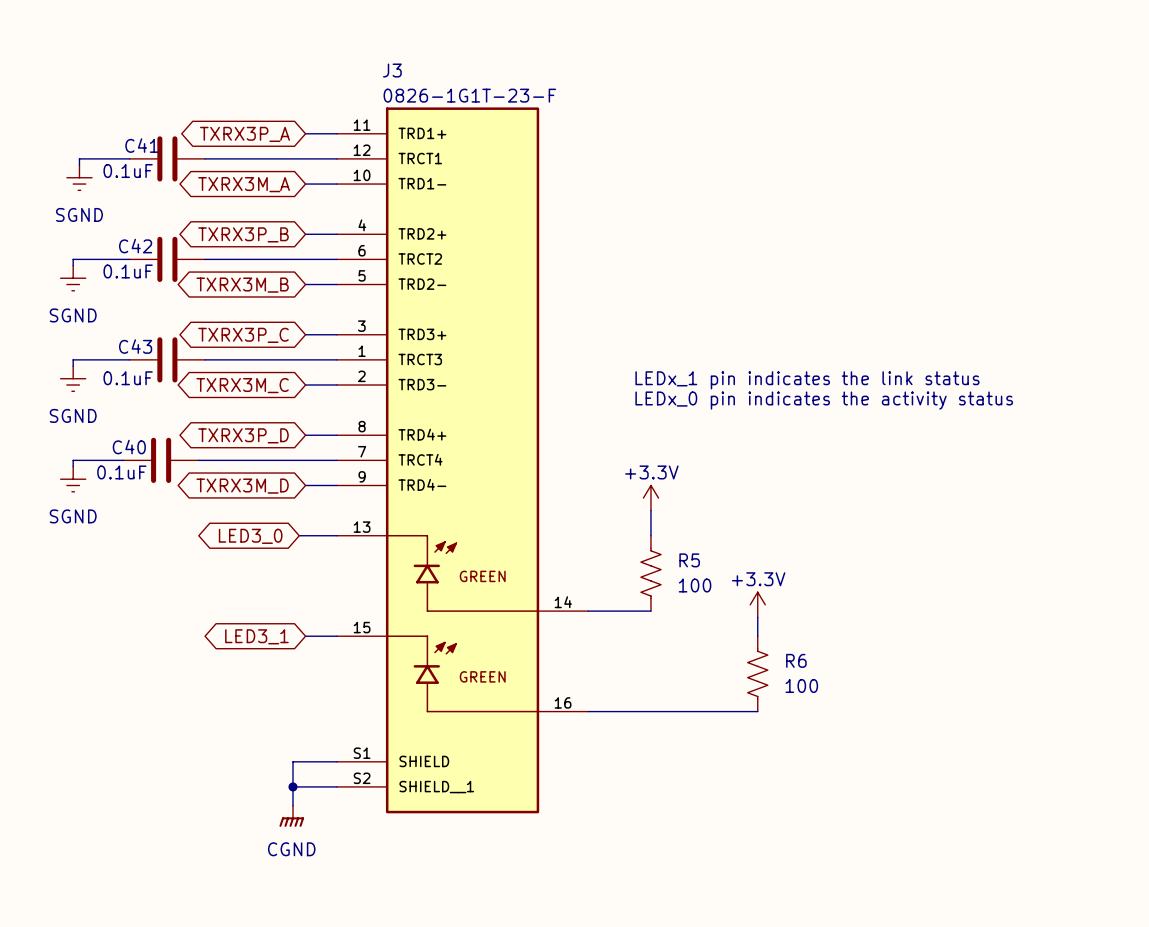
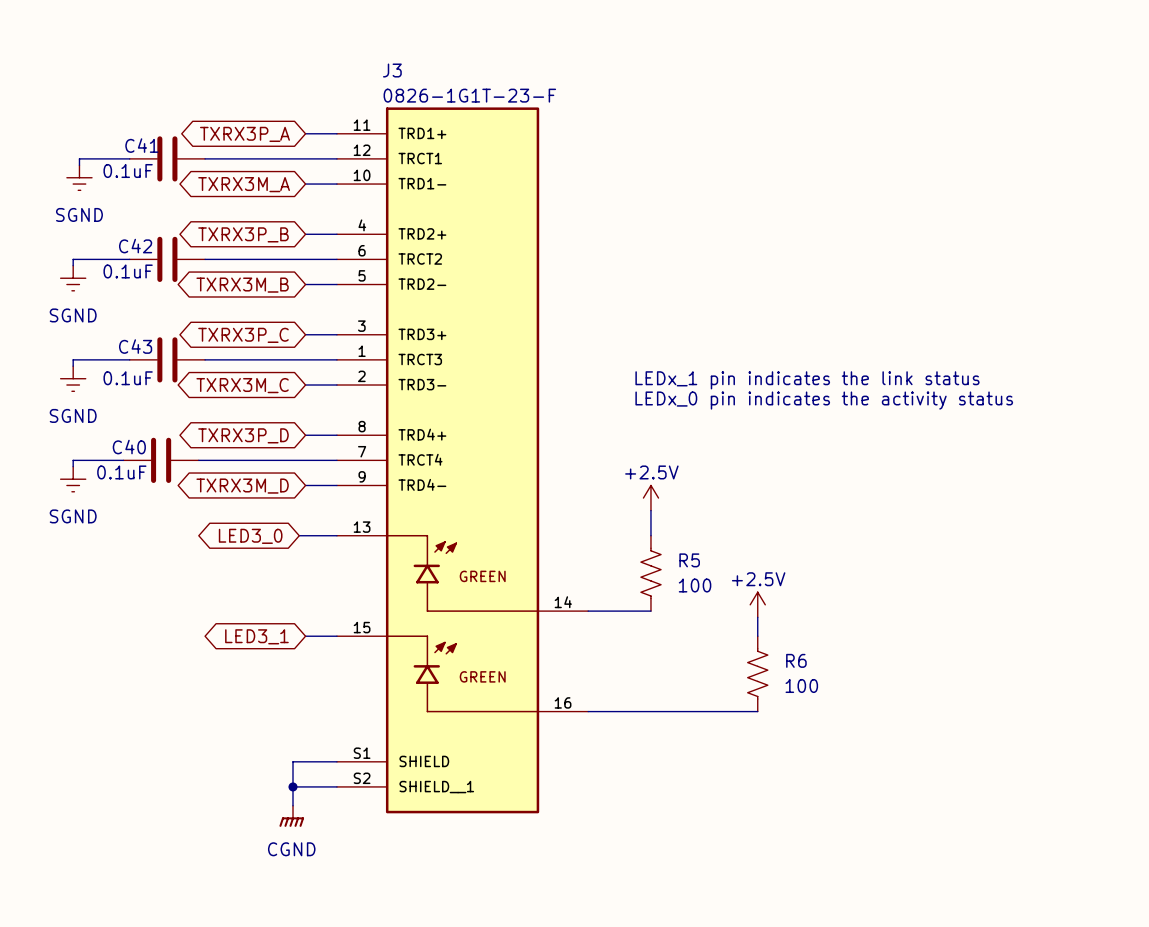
power symbol: +3.3V (650, 498) -> +2.5V (650, 498)
power symbol: +3.3V (757, 604) -> +2.5V (757, 604)

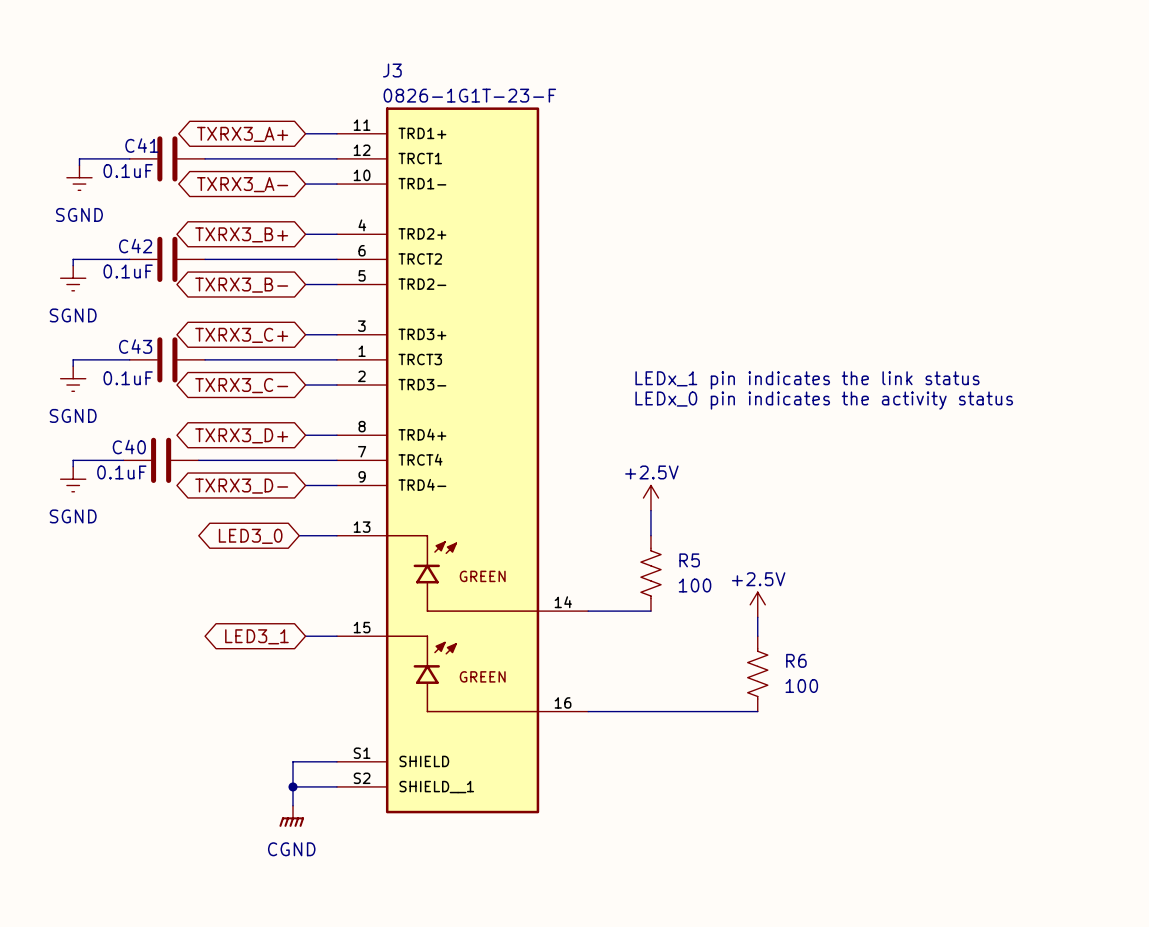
global label: TXRX3P_A (244, 134) -> TXRX3_A+ (242, 134)
global label: TXRX3M_A (244, 184) -> TXRX3_A- (242, 184)
global label: TXRX3P_B (243, 234) -> TXRX3_B+ (241, 234)
global label: TXRX3M_B (242, 285) -> TXRX3_B- (241, 285)
global label: TXRX3P_C (243, 335) -> TXRX3_C+ (241, 335)
global label: TXRX3M_C (242, 385) -> TXRX3_C- (241, 385)
global label: TXRX3P_D (243, 435) -> TXRX3_D+ (241, 435)
global label: TXRX3M_D (242, 486) -> TXRX3_D- (241, 486)

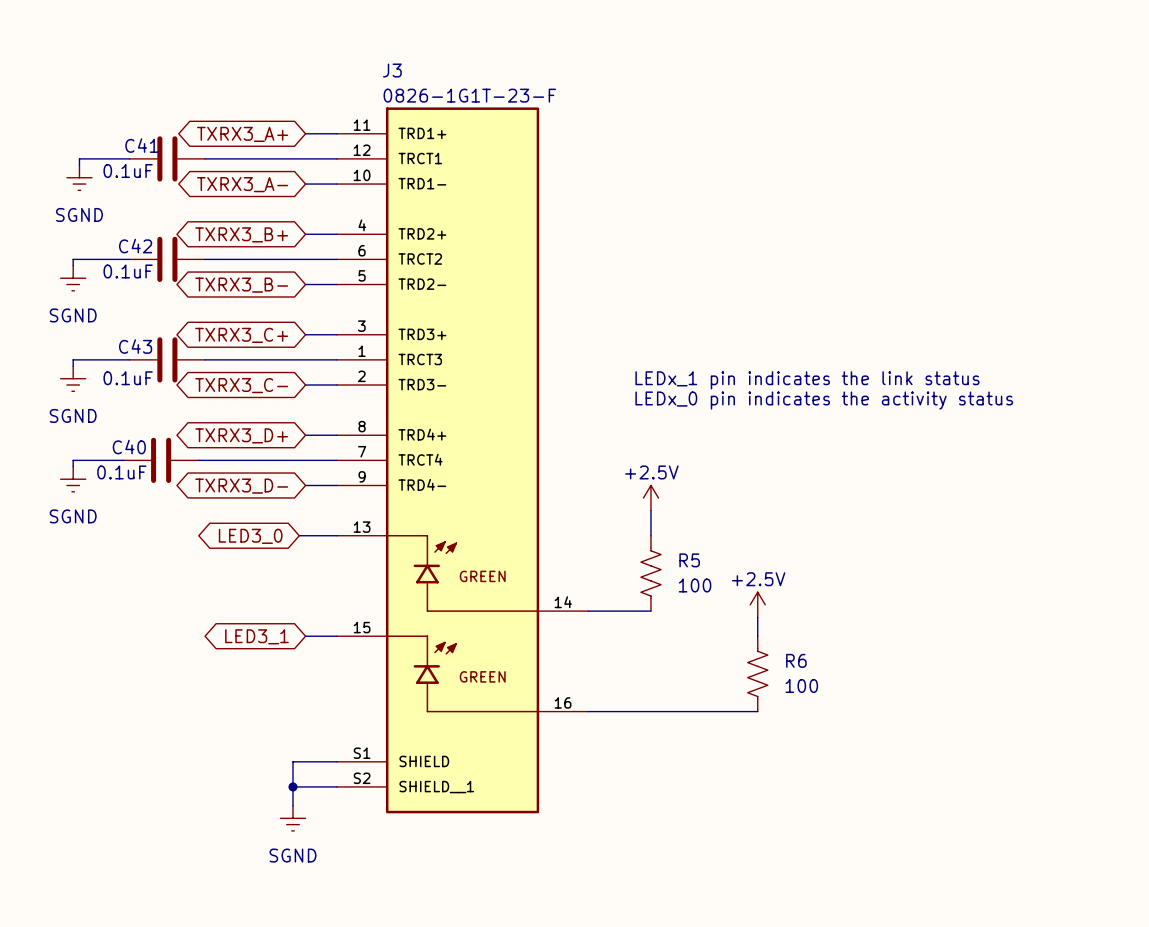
power symbol: CGND (291, 816) -> SGND (293, 818)

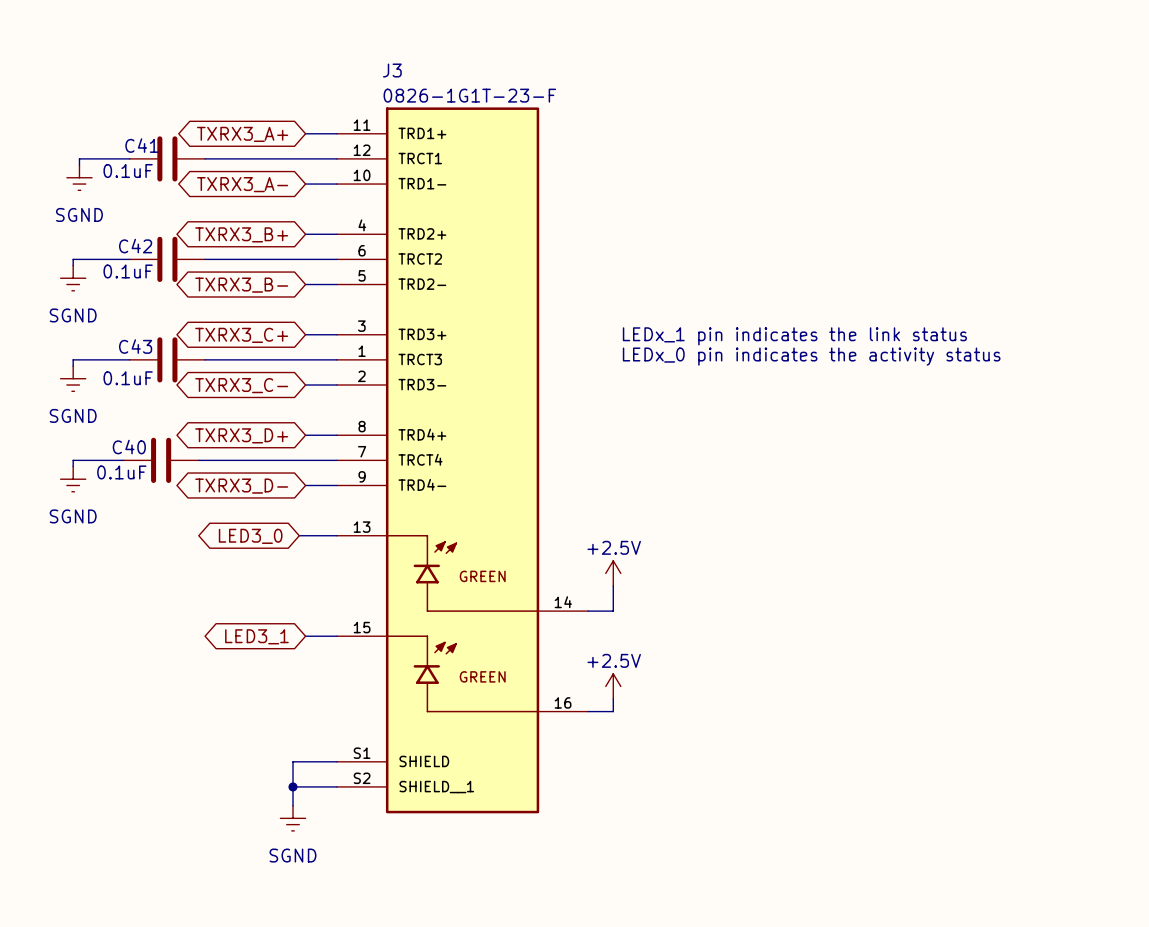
text position: LEDx_1 pin indicates the link status (807, 380) -> LEDx_1 pin indicates the link status (794, 336)
text position: LEDx_0 pin indicates the activity status (824, 400) -> LEDx_0 pin indicates the activity status (811, 356)
power symbol: +2.5V (650, 498) -> none
wire: (650, 510) (650, 535) -> none
power symbol: none -> +2.5V (613, 573)
R5: 100 (650, 573) -> none
power symbol: +2.5V (757, 604) -> none
wire: (613, 611) (650, 611) -> (613, 611) (613, 585)
wire: (757, 617) (757, 636) -> none
R6: 100 (757, 673) -> none
power symbol: none -> +2.5V (613, 686)
wire: (613, 711) (757, 711) -> (613, 711) (613, 699)

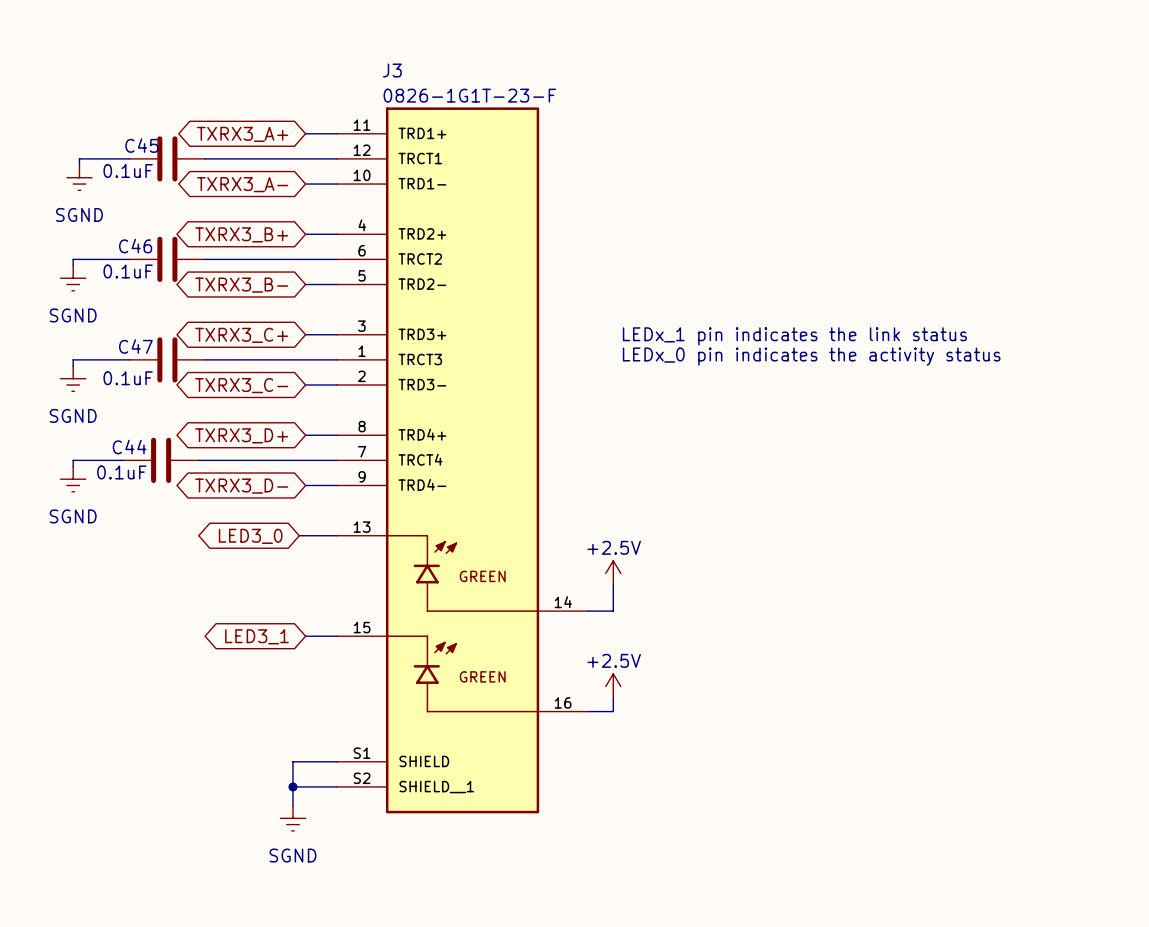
C41 name: C41 (141, 145) -> C45 (141, 145)
C42 name: C42 (135, 246) -> C46 (135, 246)
C43 name: C43 (135, 346) -> C47 (135, 346)
C40 name: C40 (129, 447) -> C44 (129, 447)

